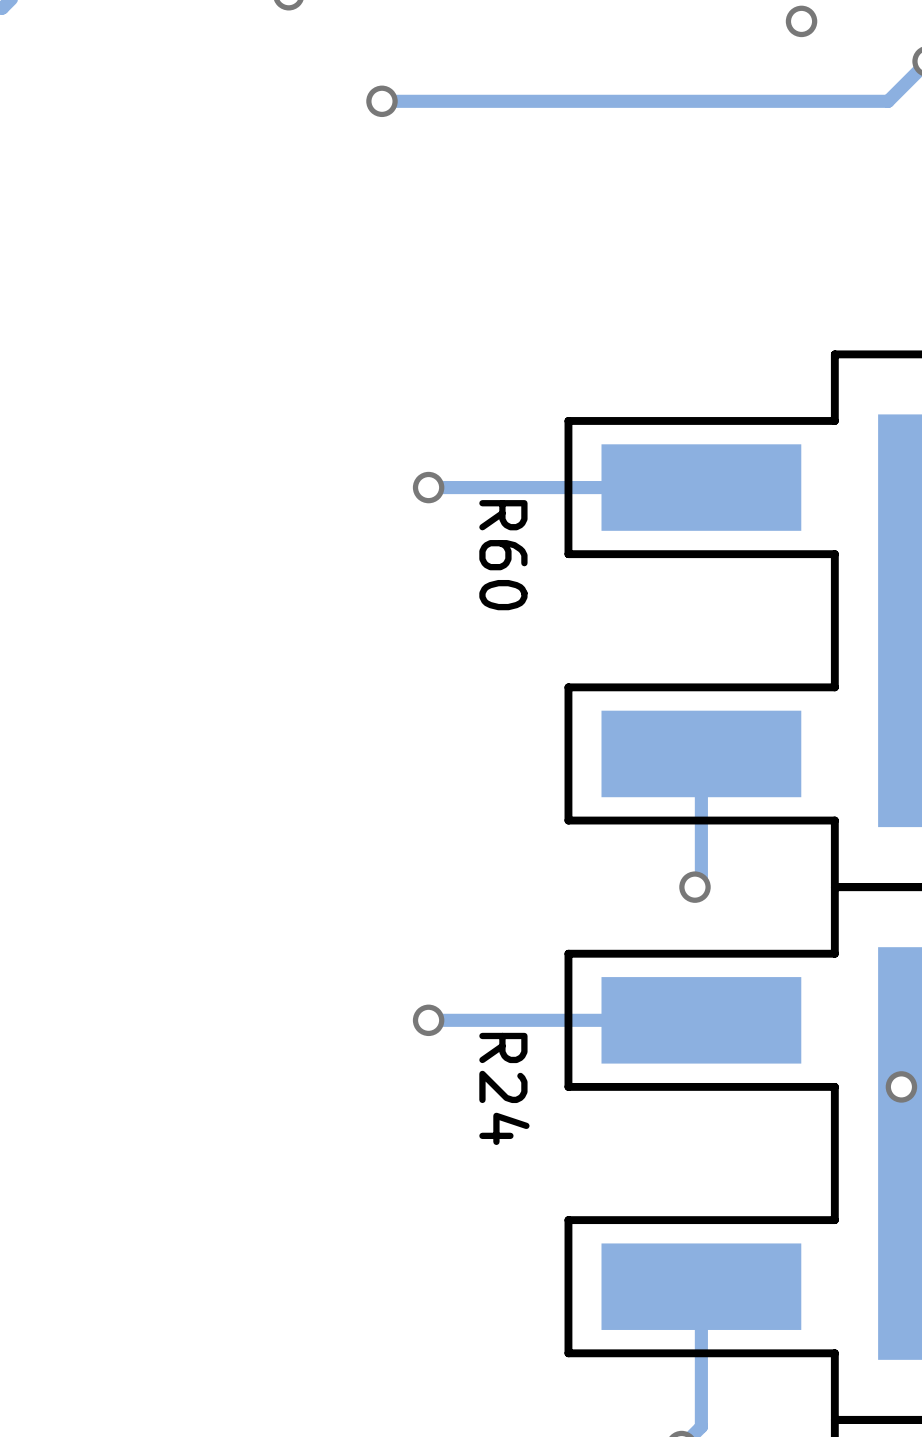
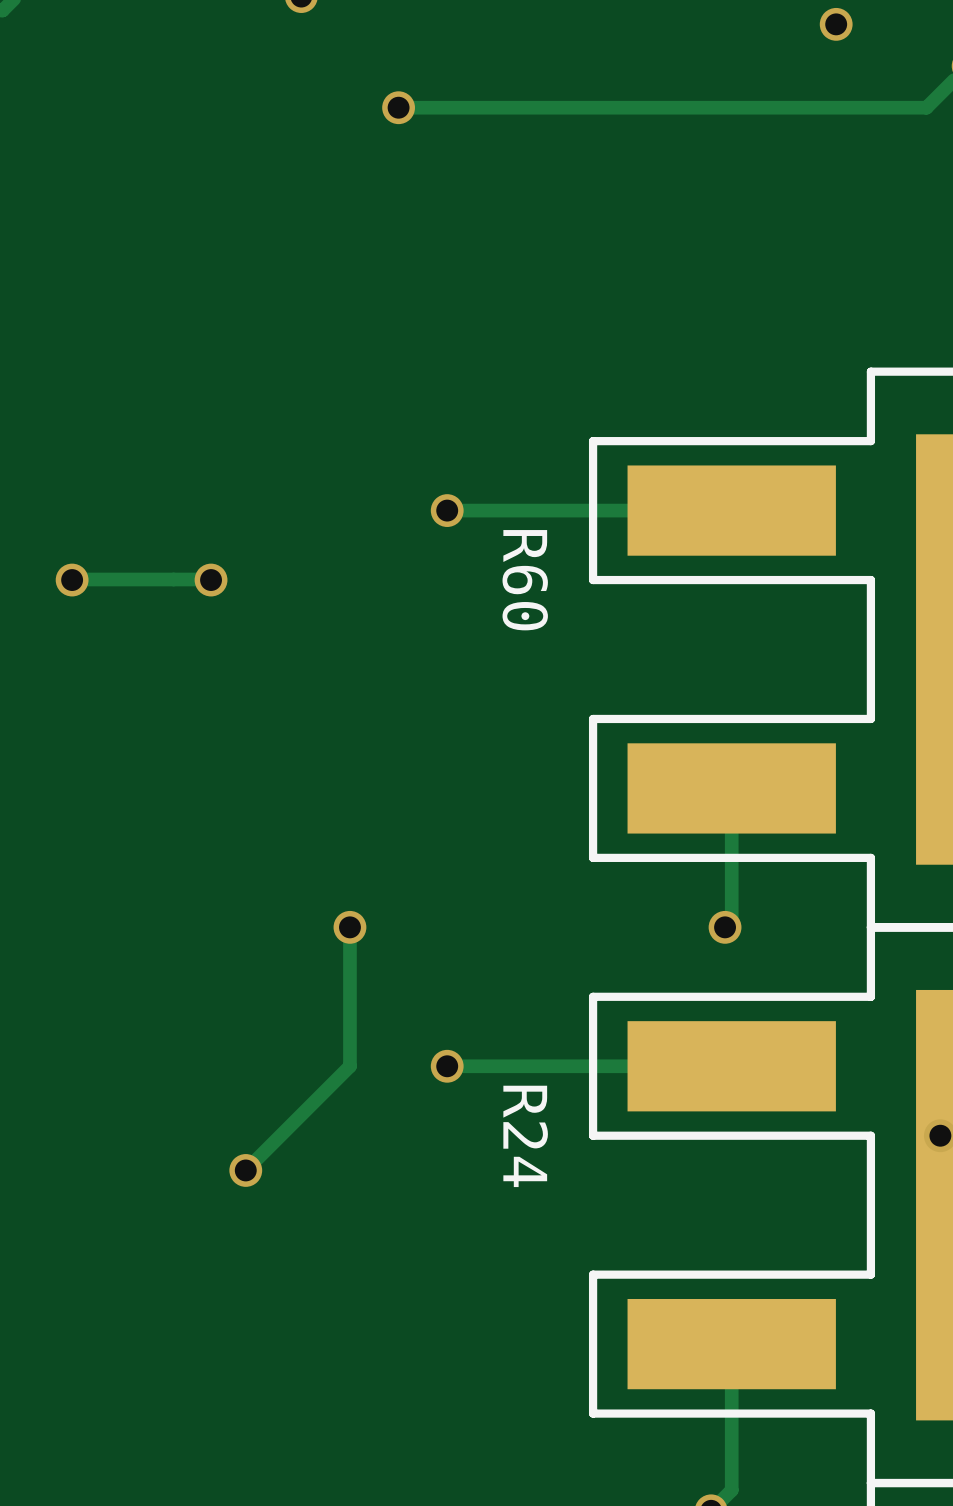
track: none -> (210, 579) (72, 579)
via: none -> (72, 580)
via: none -> (211, 580)
track: none -> (349, 927) (349, 1066) (245, 1170)
via: none -> (349, 927)
via: none -> (245, 1170)

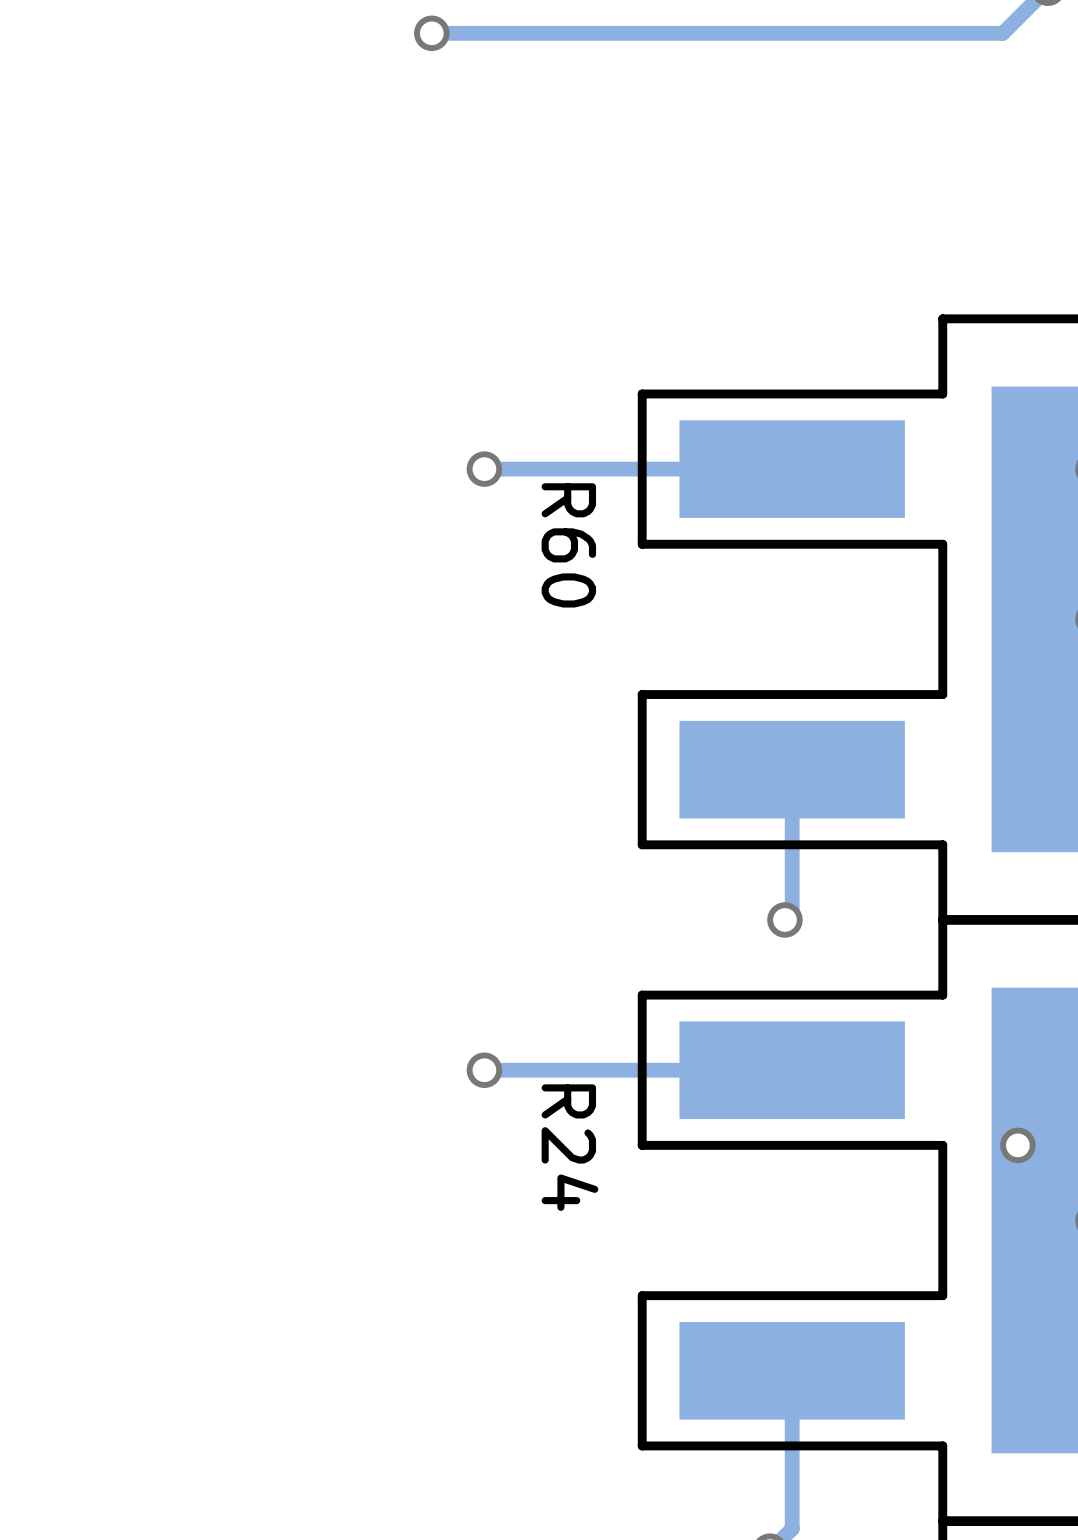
track: (210, 579) (72, 579) -> none
via: (72, 580) -> none
via: (211, 580) -> none
track: (349, 927) (349, 1066) (245, 1170) -> none
via: (349, 927) -> none
via: (245, 1170) -> none

